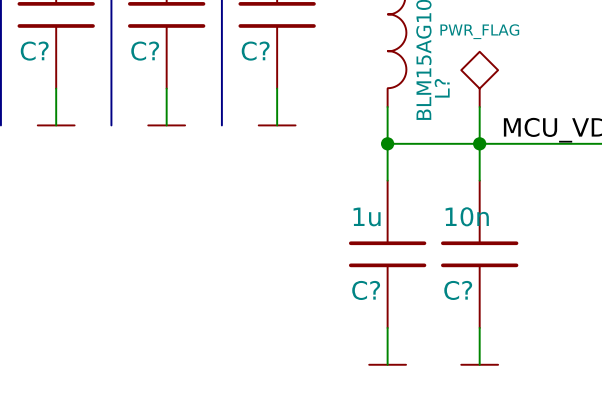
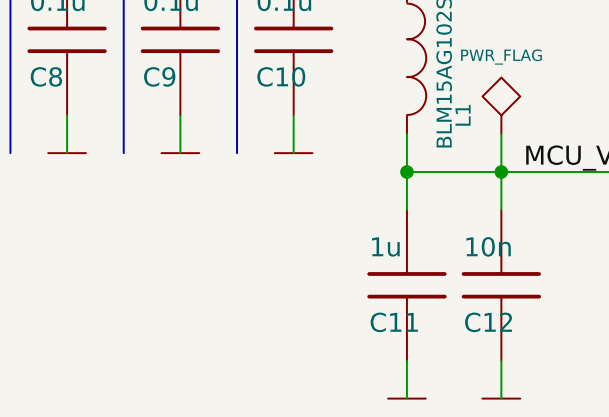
C? name: C? (34, 51) -> C8 (46, 76)
C? name: C? (145, 51) -> C9 (159, 76)
C? name: C? (255, 51) -> C10 (281, 76)
L? name: L? (442, 88) -> L1 (463, 115)
C? name: C? (366, 290) -> C11 (394, 322)
C? name: C? (458, 290) -> C12 (488, 322)

